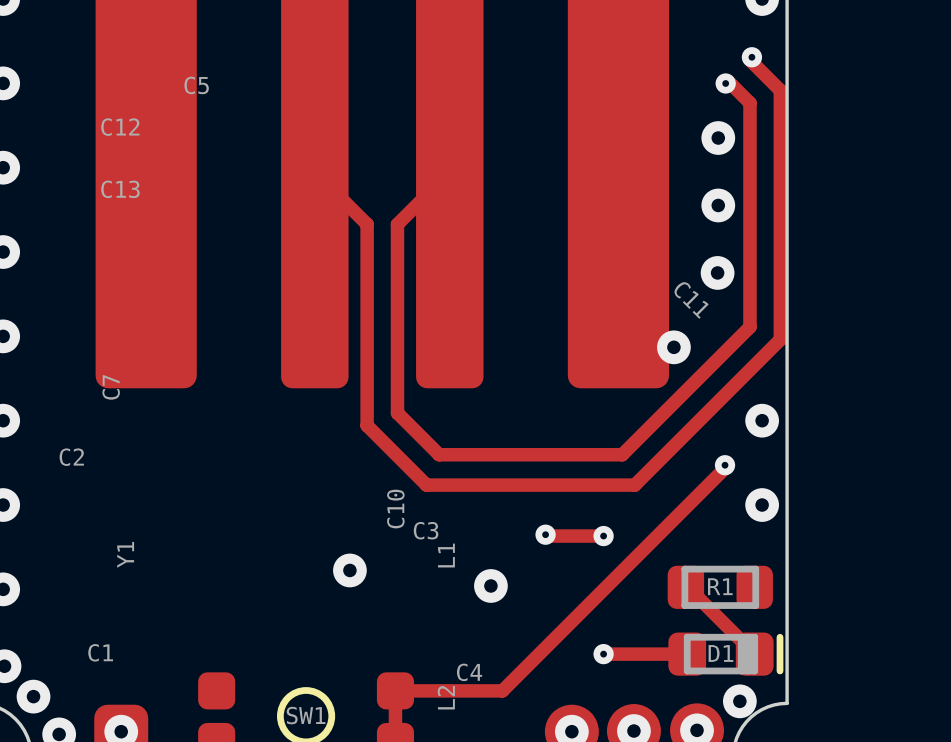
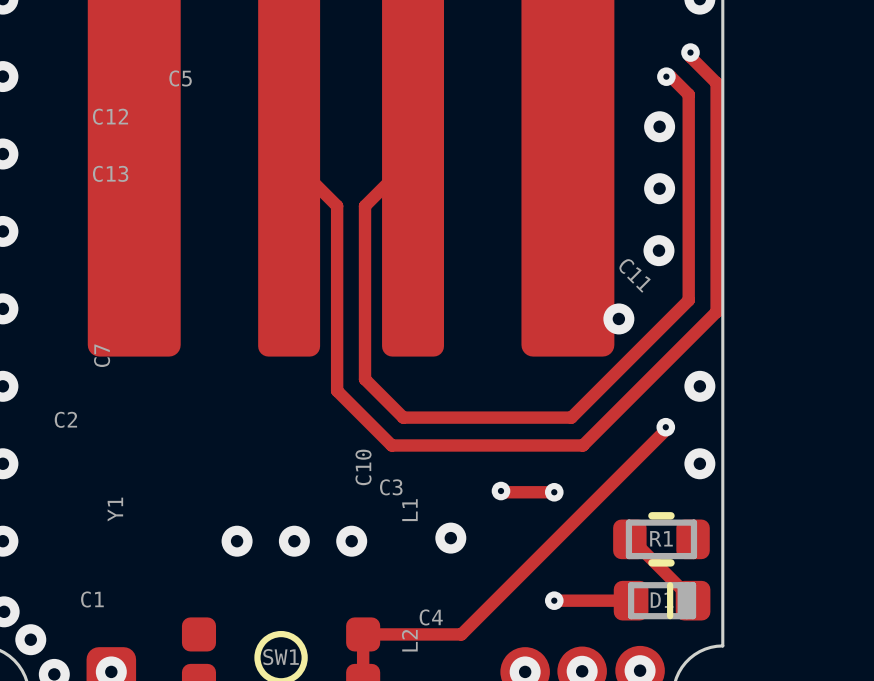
R1 footprint: [667, 565, 773, 609] -> [613, 512, 710, 567]
via: (349, 570) -> none
via: none -> (237, 541)
via: none -> (294, 541)
via: none -> (351, 541)
D1 footprint: [668, 632, 784, 676] -> [613, 580, 711, 621]
via: (739, 701) -> none

